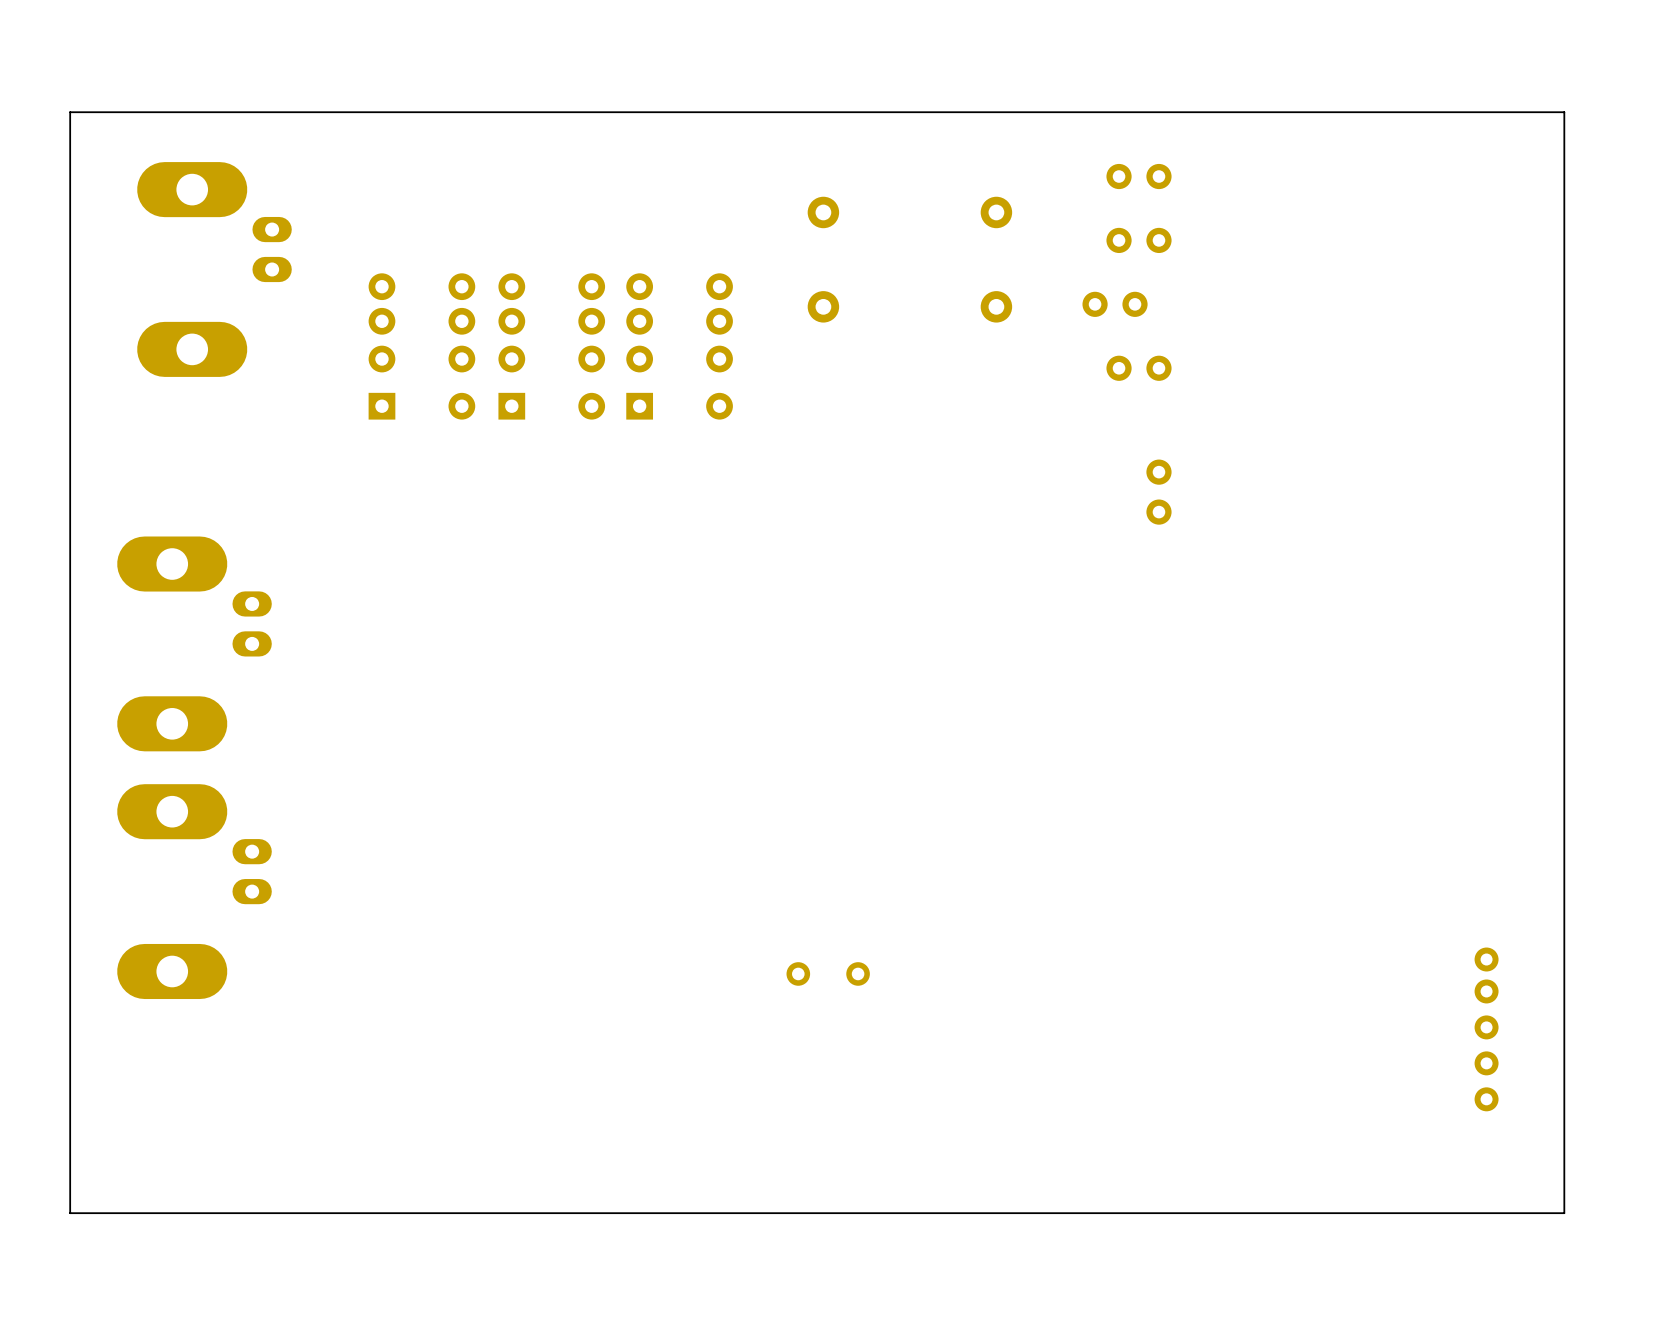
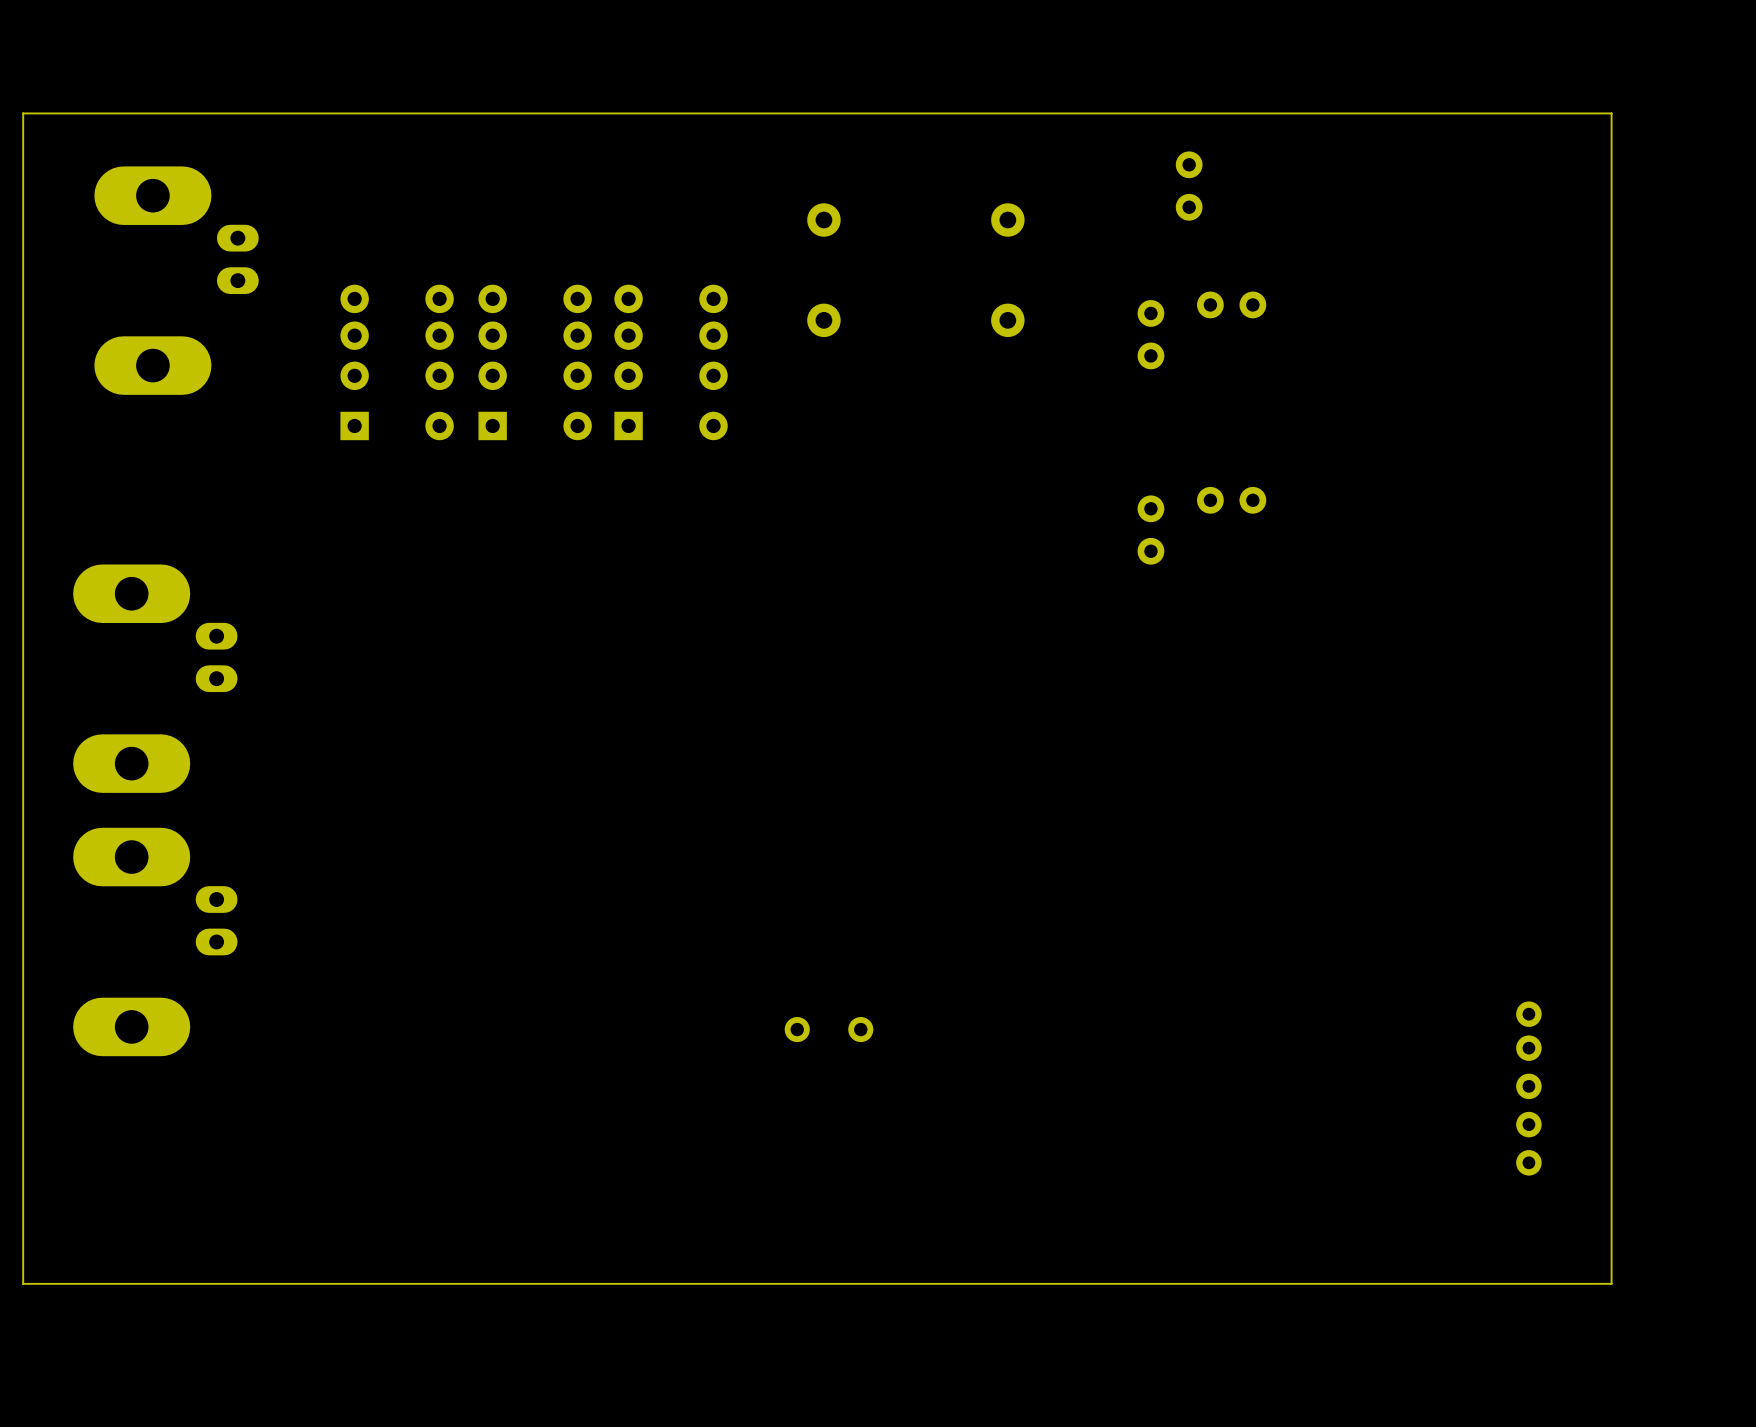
part rotation: 0° (1139, 176) -> 90° clockwise (1189, 186)
part: (1139, 240) -> none
part: none -> (1231, 304)
part rotation: 0° (1115, 304) -> 90° clockwise (1150, 334)
part: (1139, 368) -> none
part: none -> (1231, 500)
part: (1158, 492) -> none
part: none -> (1150, 530)

